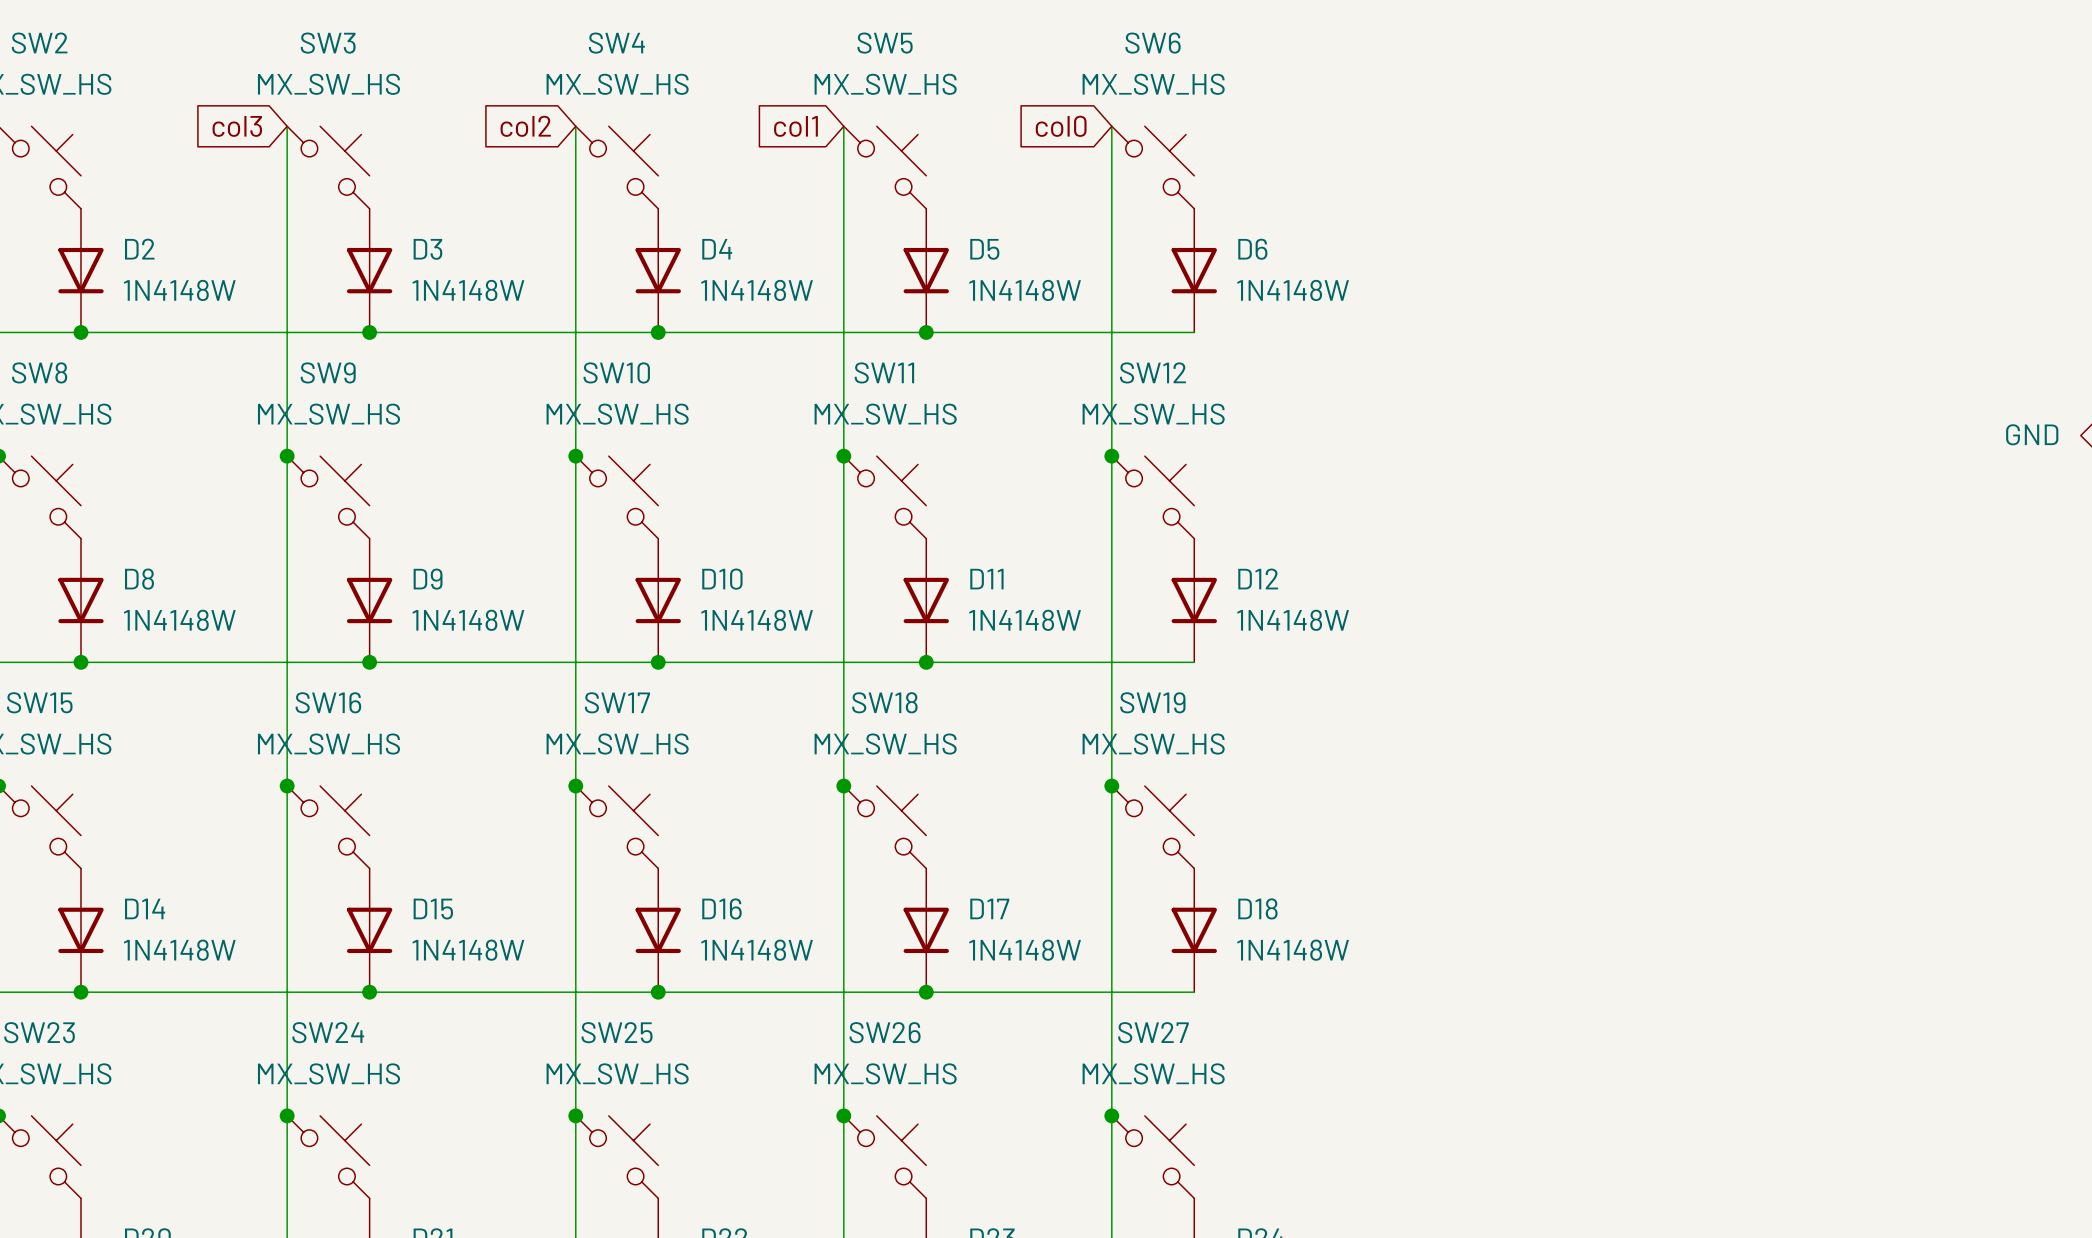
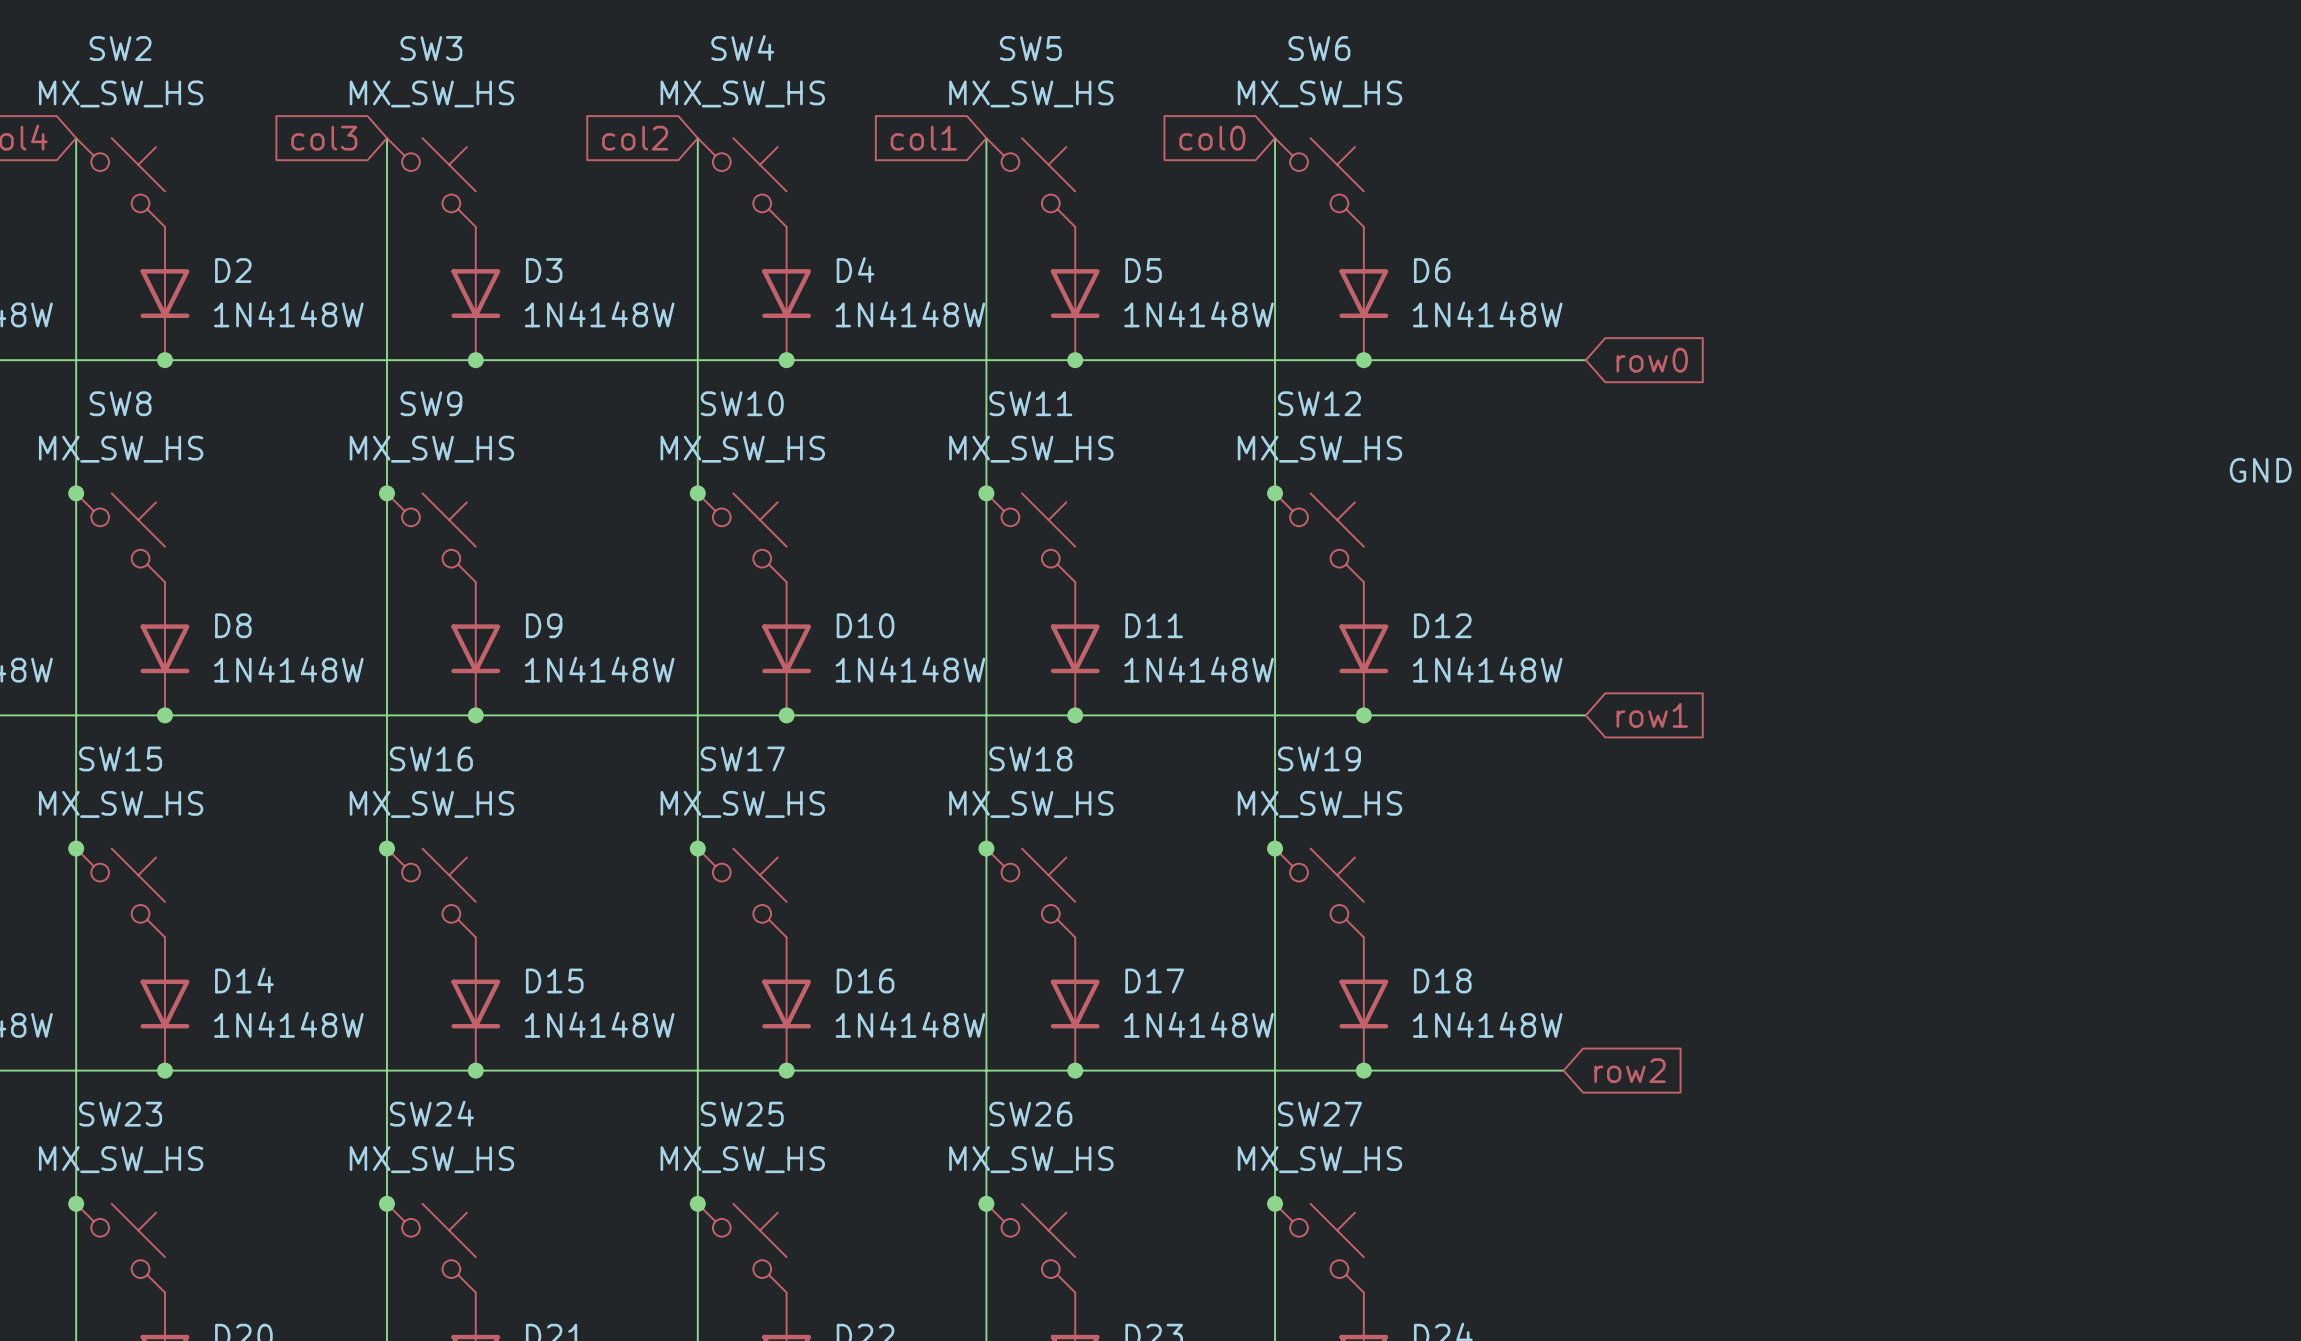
wire: none -> (1363, 360) (1585, 360)
junction: none -> (1363, 360)
global label: none -> row0 (1652, 360)
wire: none -> (1363, 715) (1585, 715)
junction: none -> (1363, 715)
global label: none -> row1 (1652, 715)
wire: none -> (1363, 1070) (1563, 1070)
junction: none -> (1363, 1070)
global label: none -> row2 (1630, 1070)

